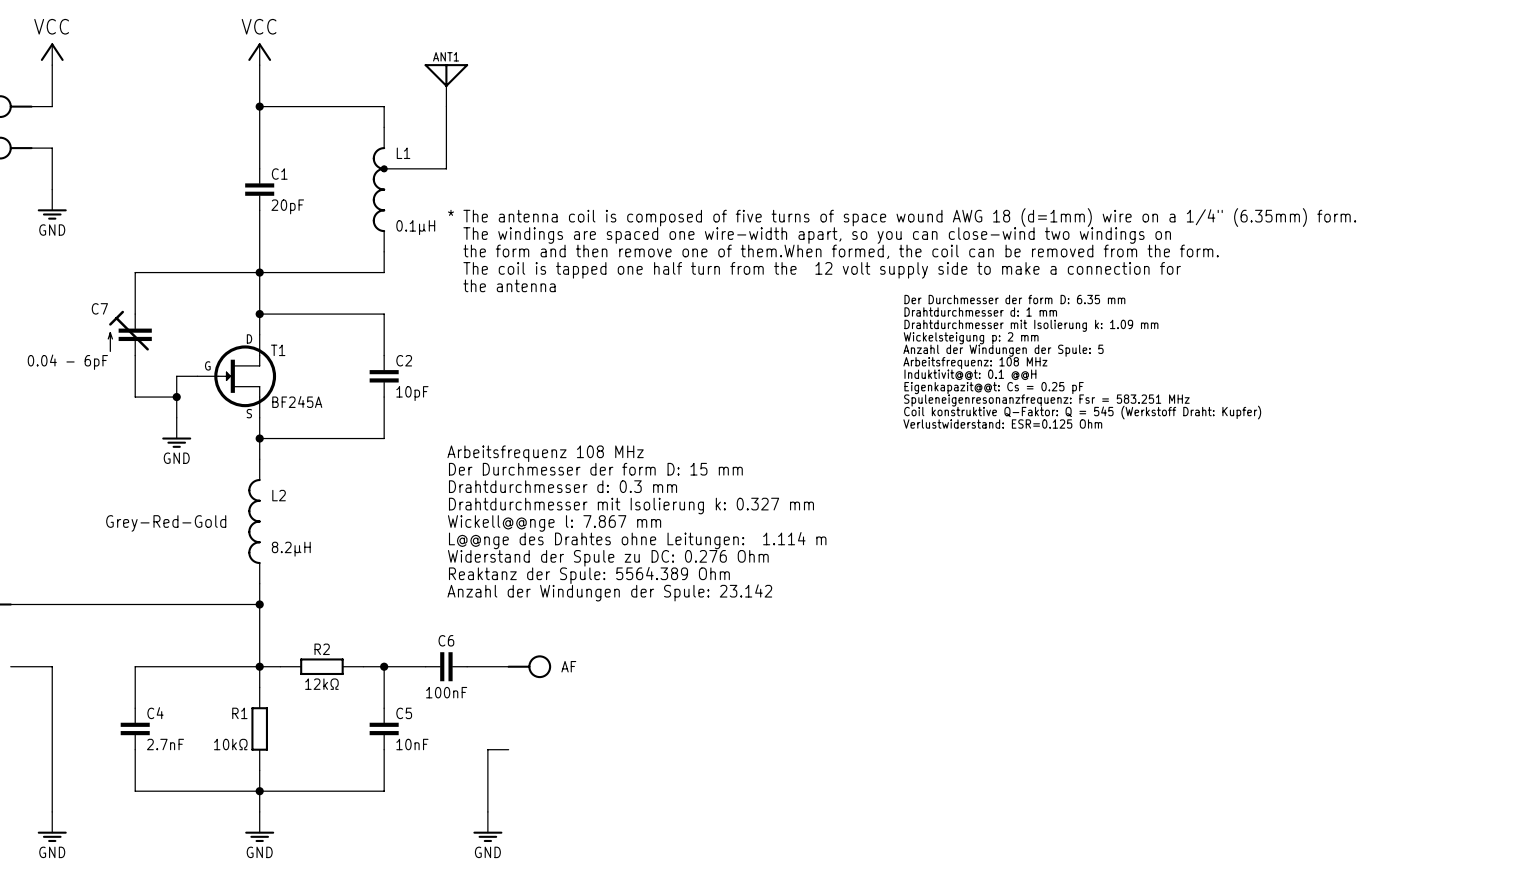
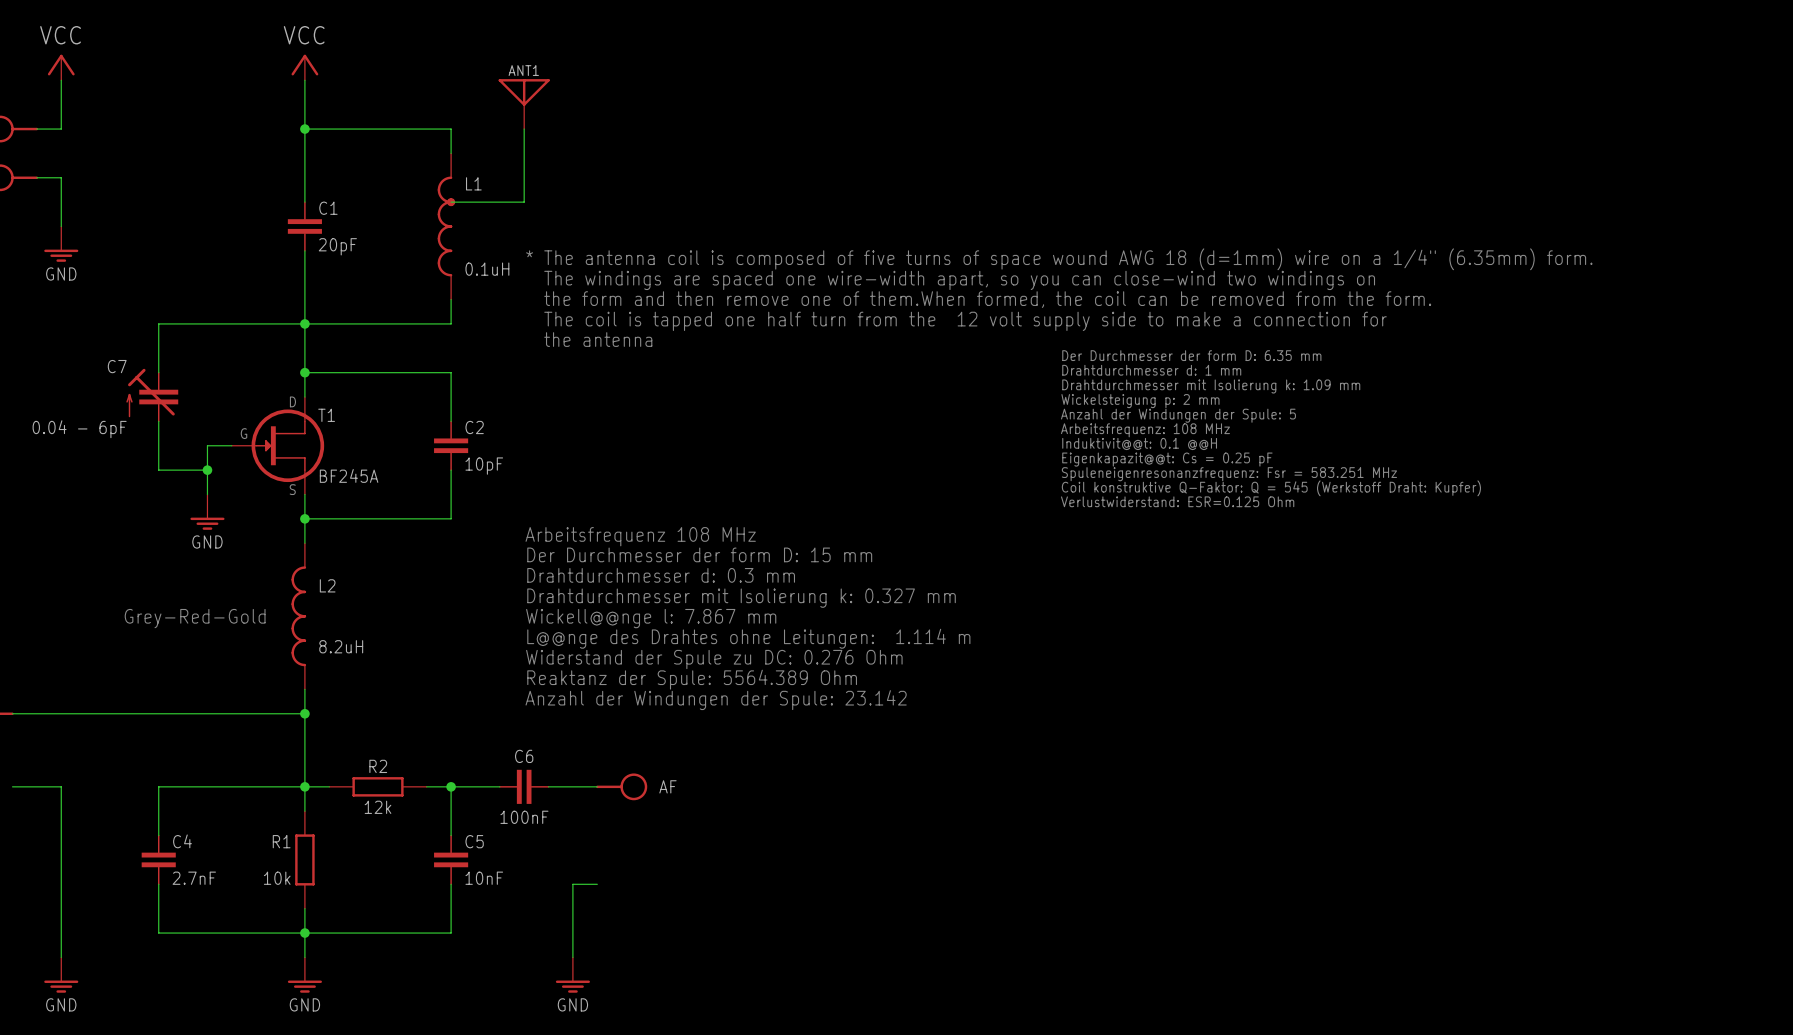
L1 value: 0.1μH (415, 227) -> 0.1uH (487, 269)
L2 value: 8.2μH (291, 549) -> 8.2uH (341, 646)
R2 value: 12kΩ (321, 684) -> 12k (378, 807)
R1 value: 10kΩ (230, 744) -> 10k (277, 878)

